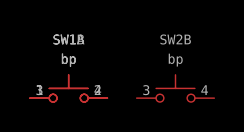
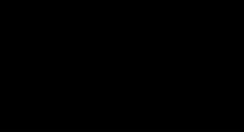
part: bp (68, 88) -> none
part: bp (68, 88) -> none
SW2B: bp (175, 88) -> none

